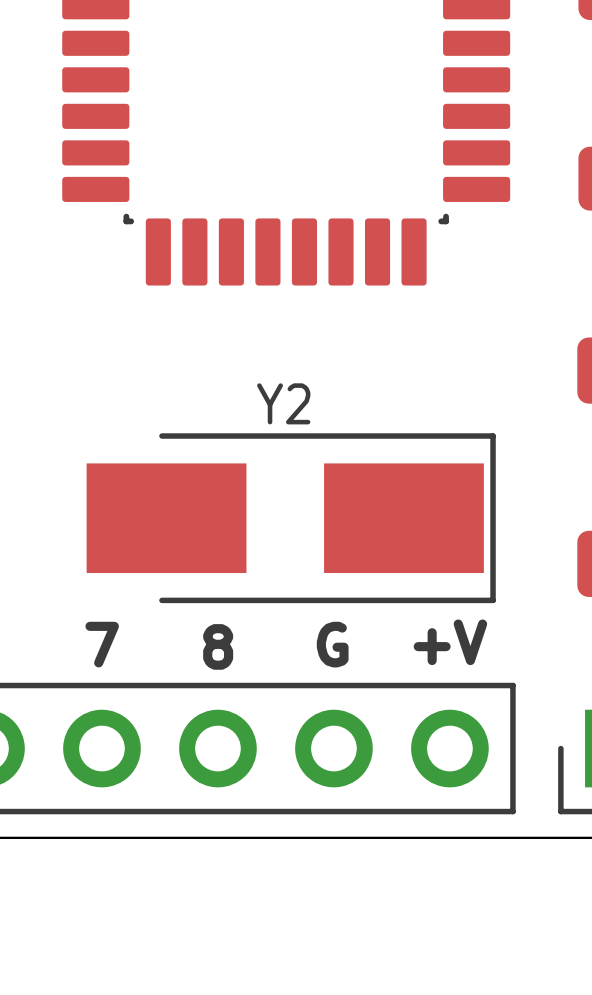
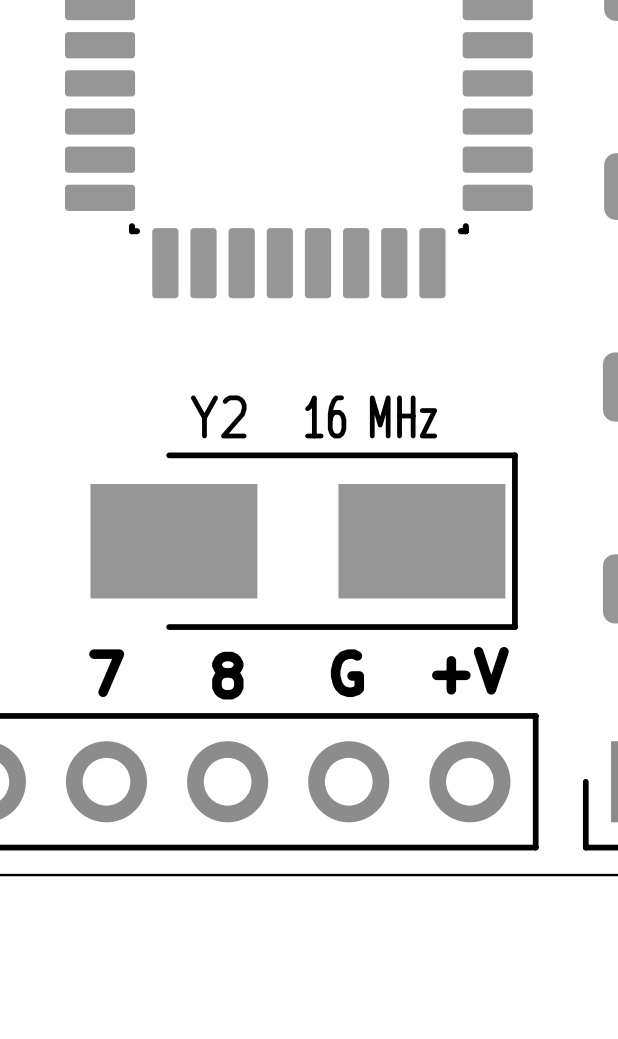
Y2 value: none -> 16 MHz (371, 416)
Y2 name position: Y2 (283, 403) -> Y2 (218, 416)

